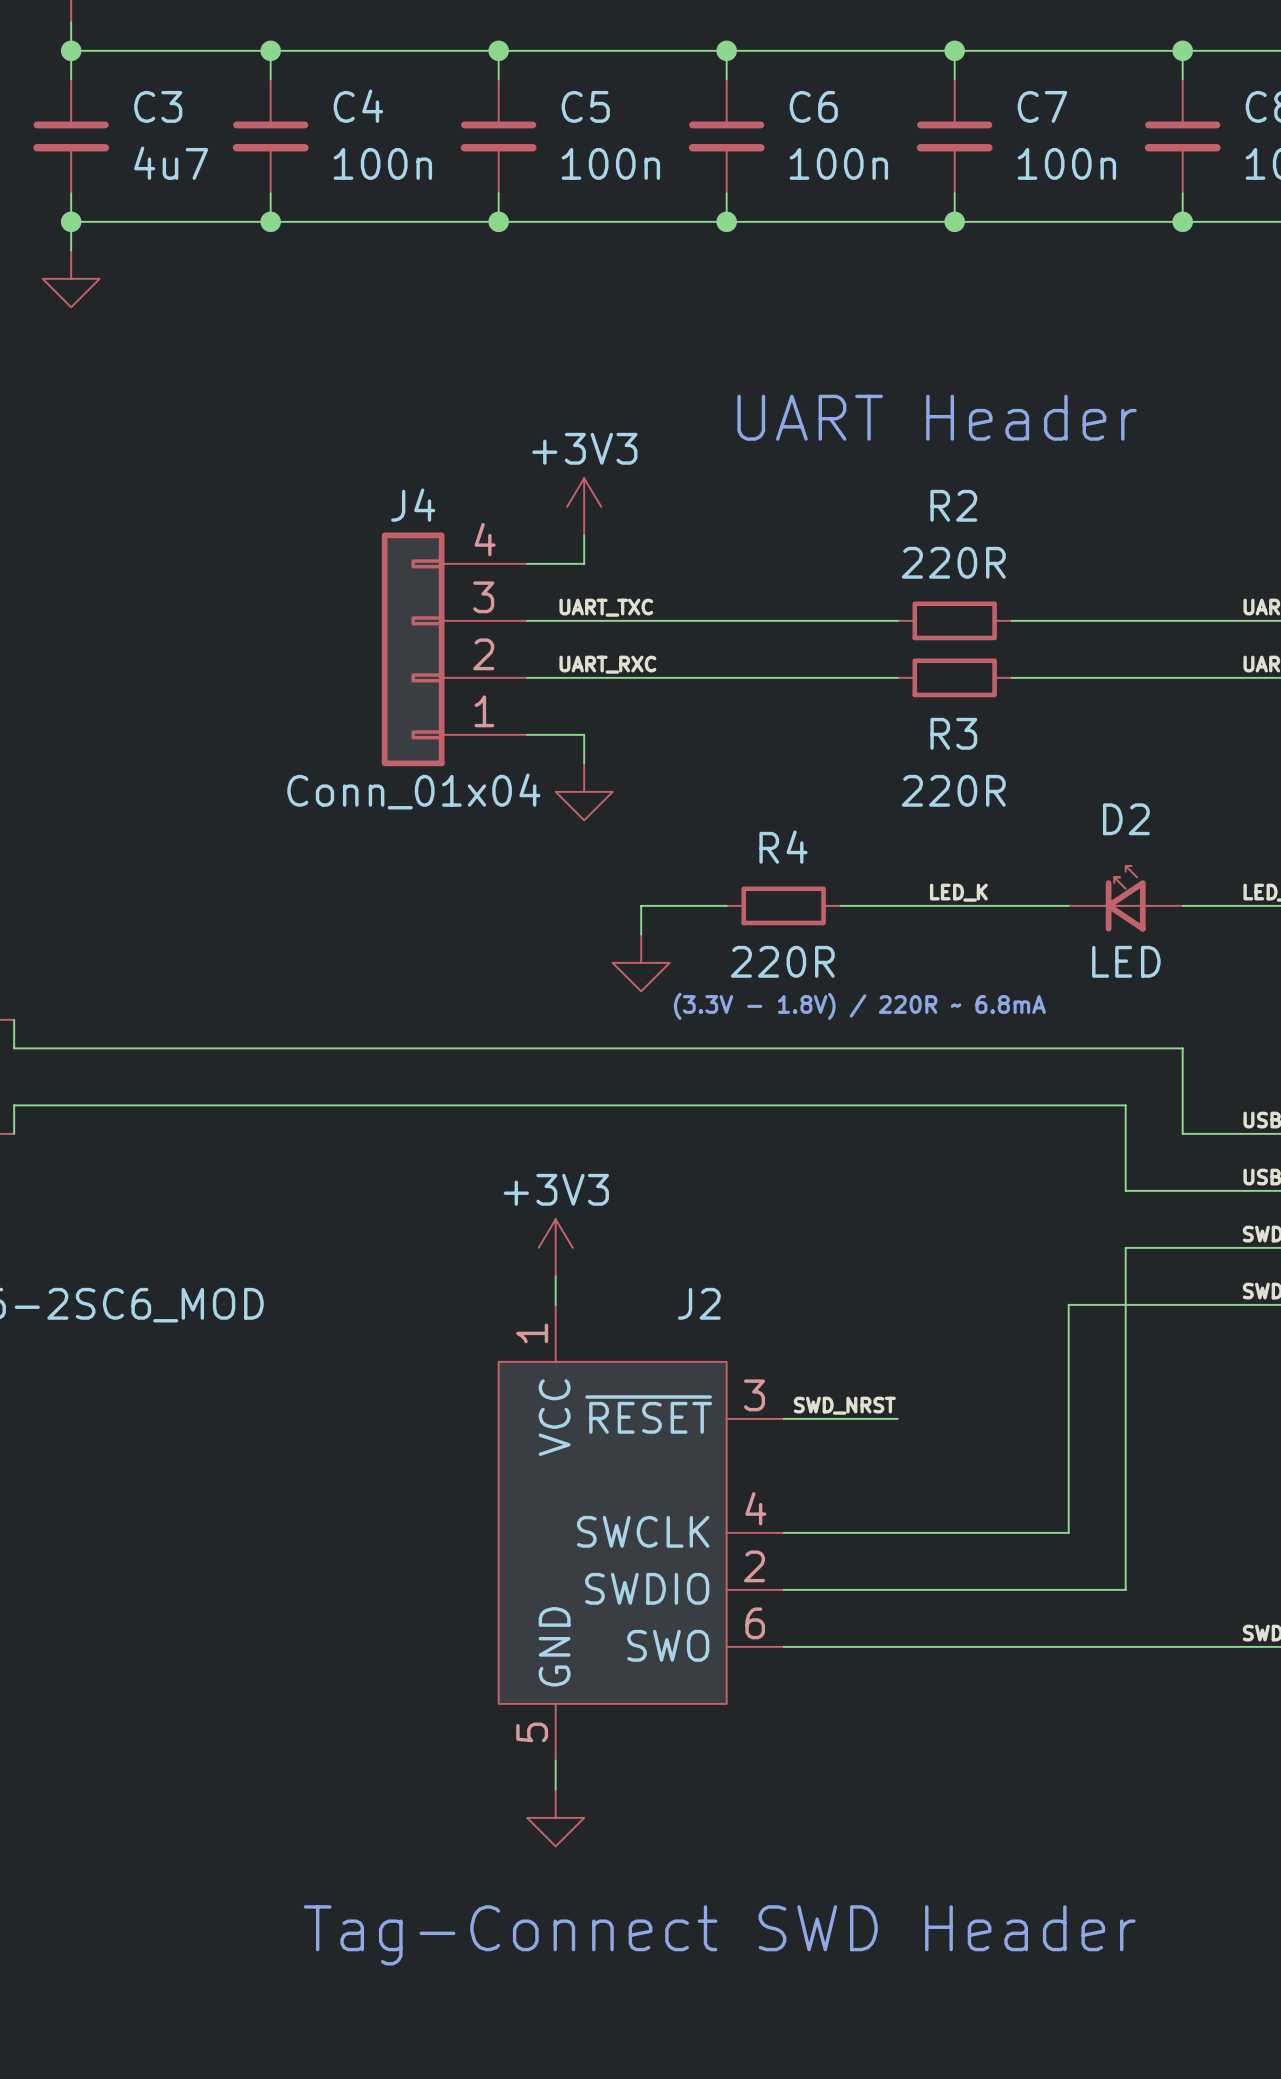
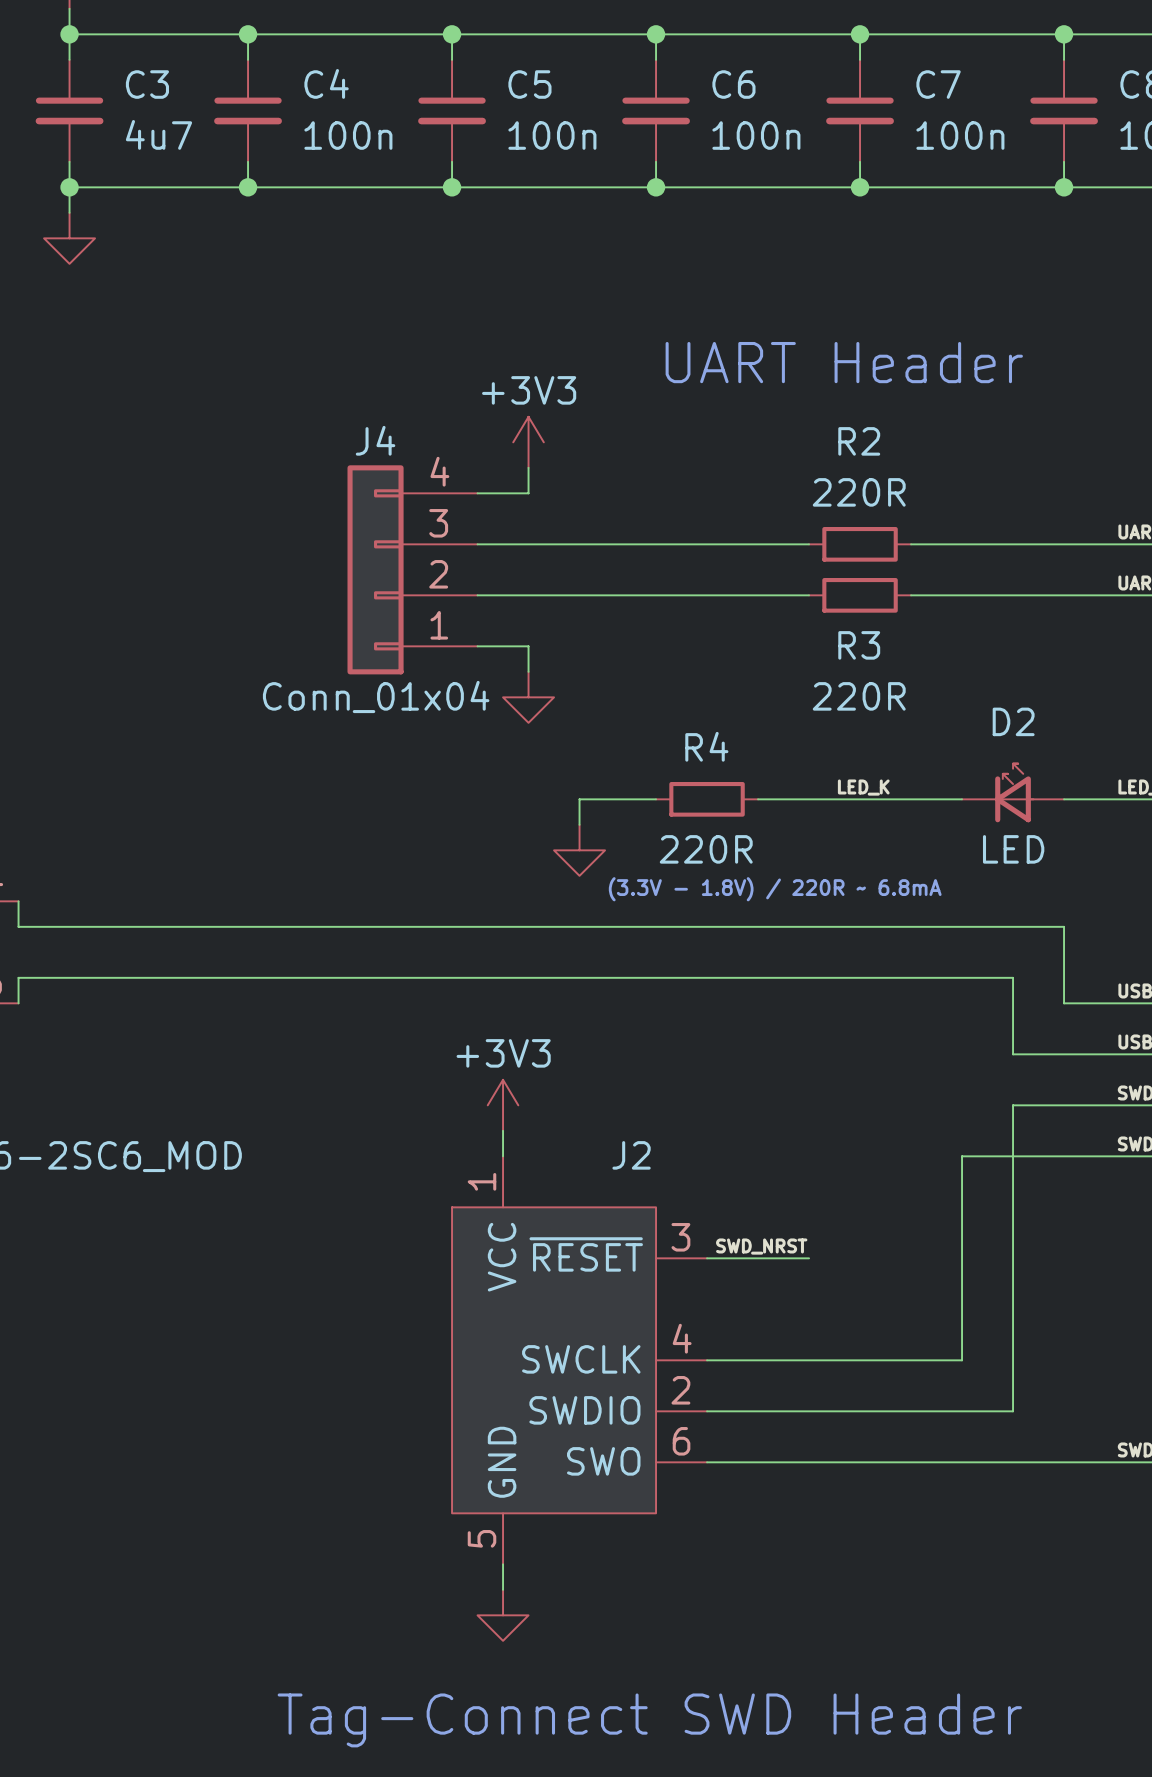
label: UART_TXC (606, 607) -> none
label: UART_RXC (607, 664) -> none

